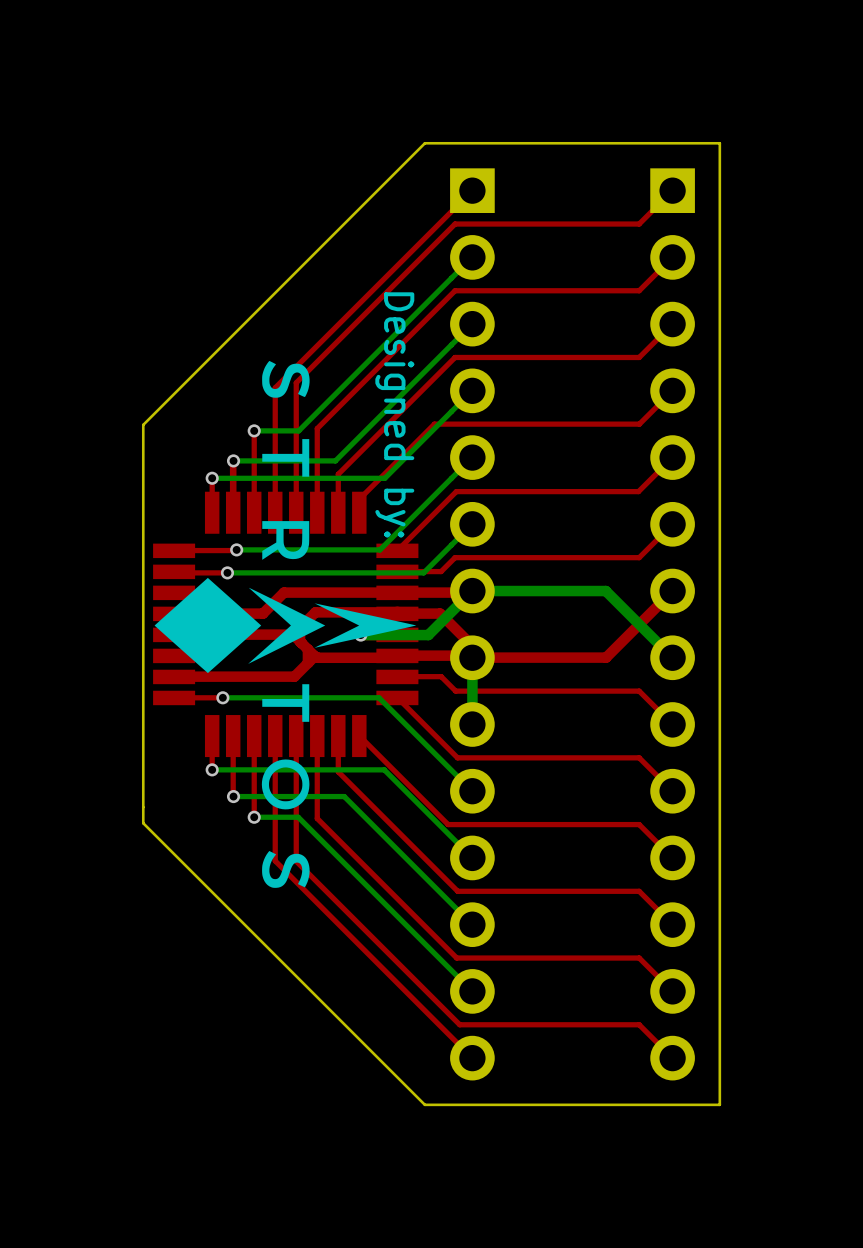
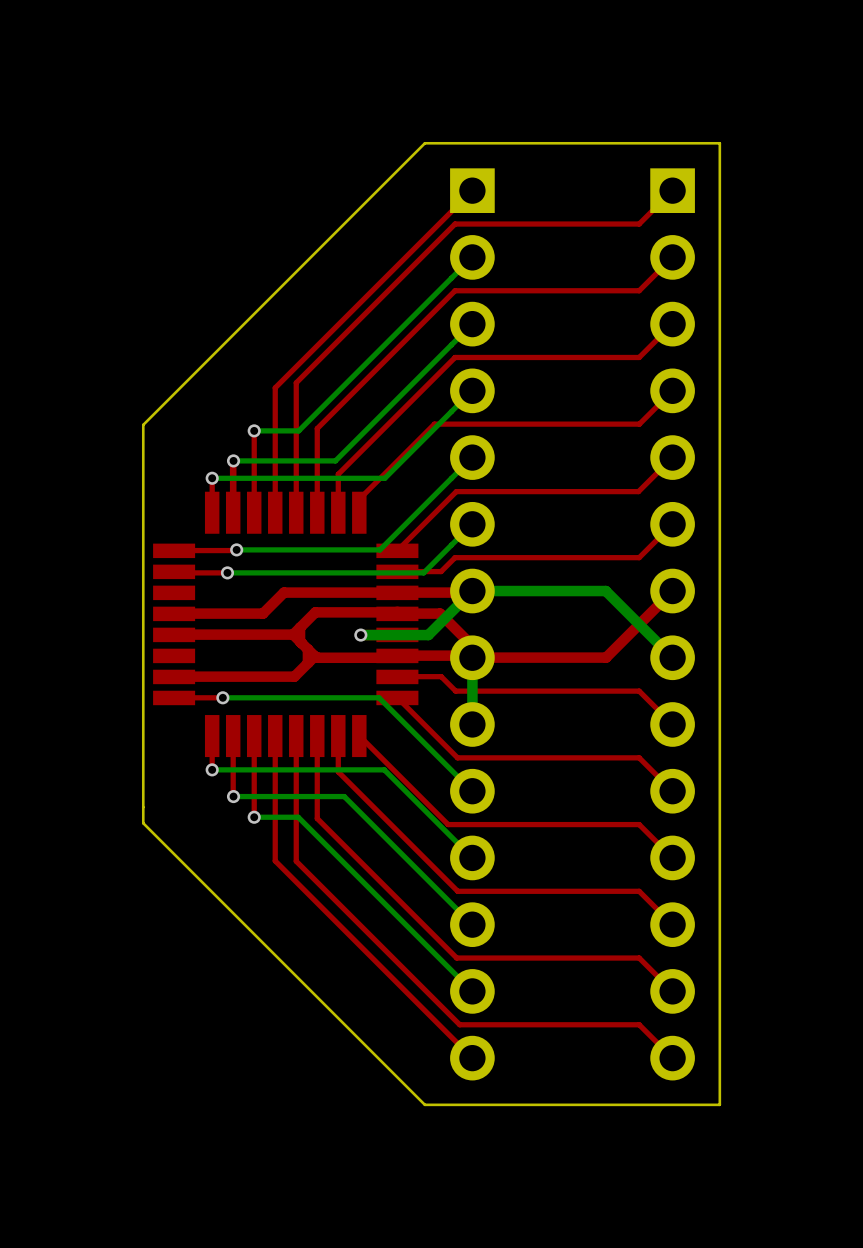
drawing: [154, 360, 417, 888] -> none
text: Designed by: (394, 414) -> none

